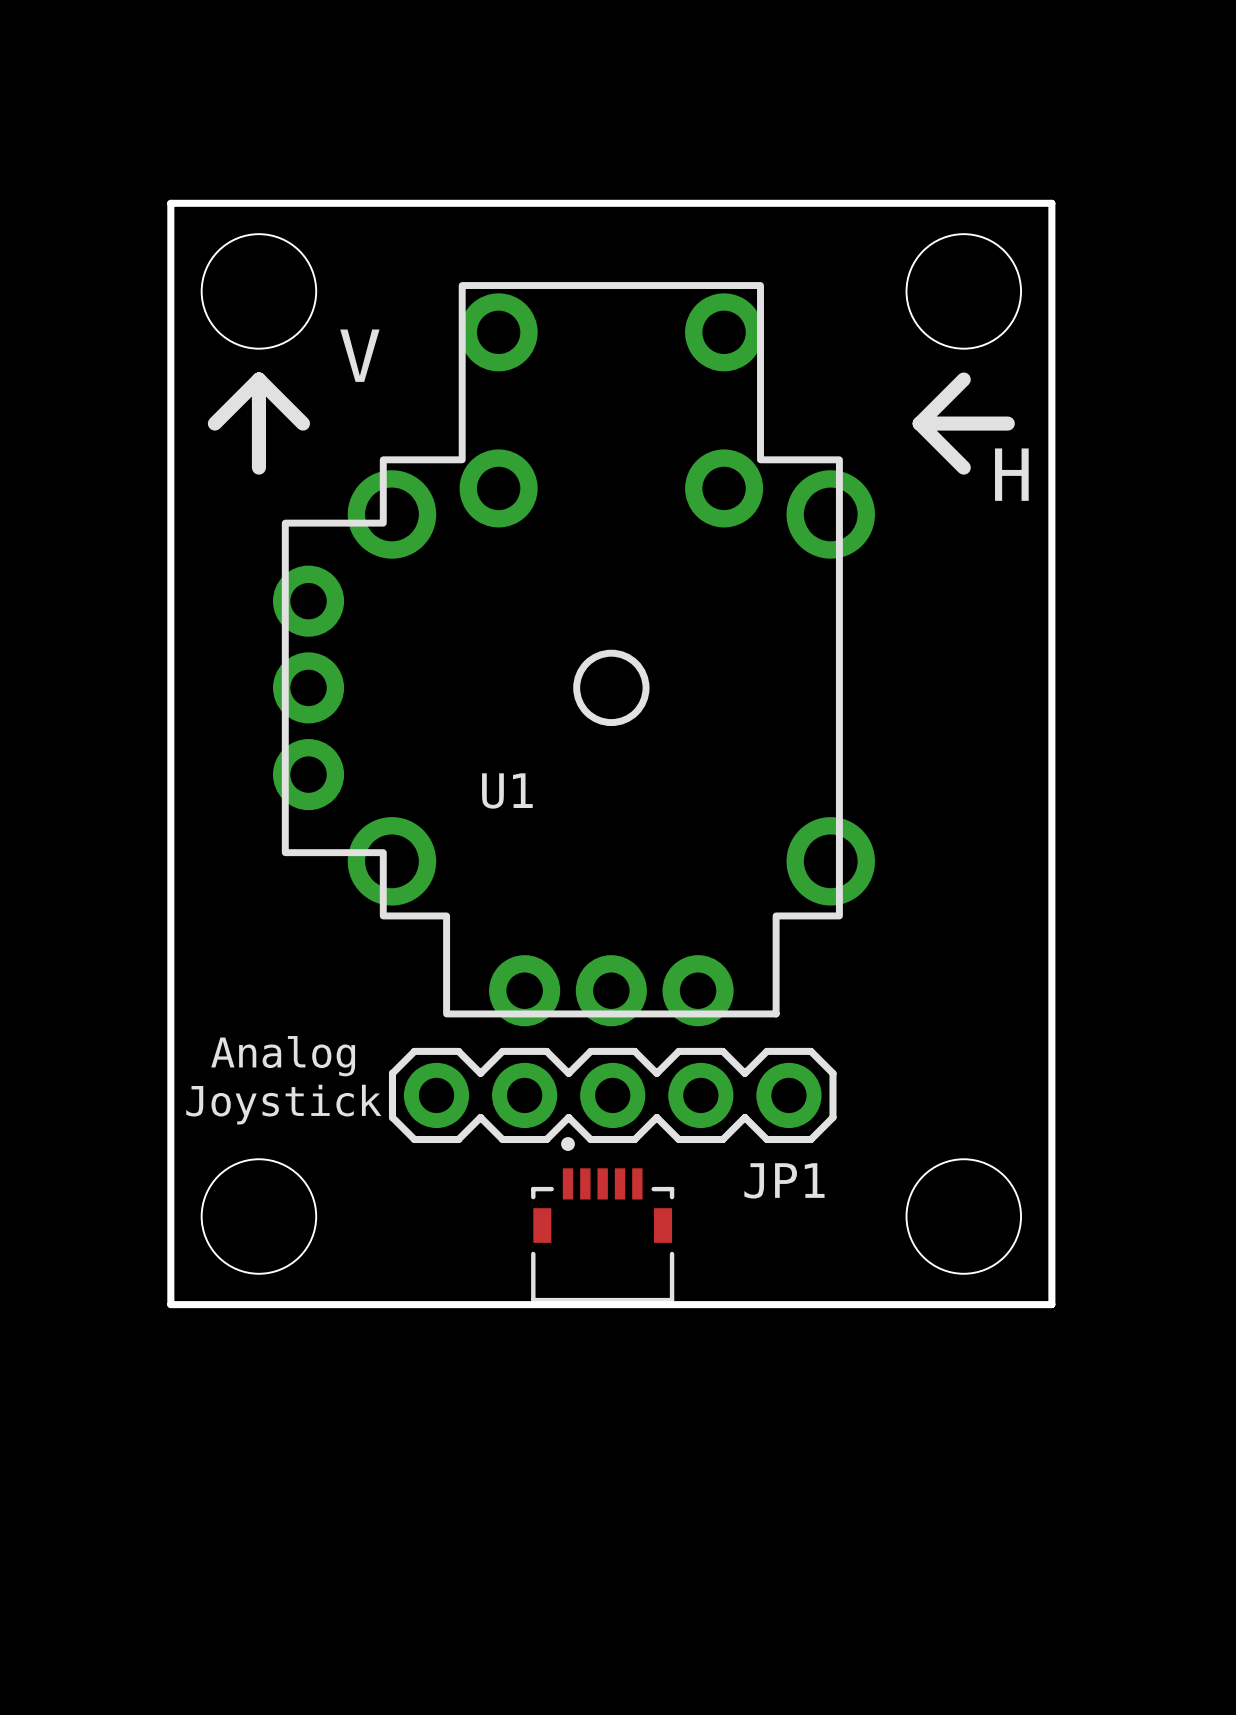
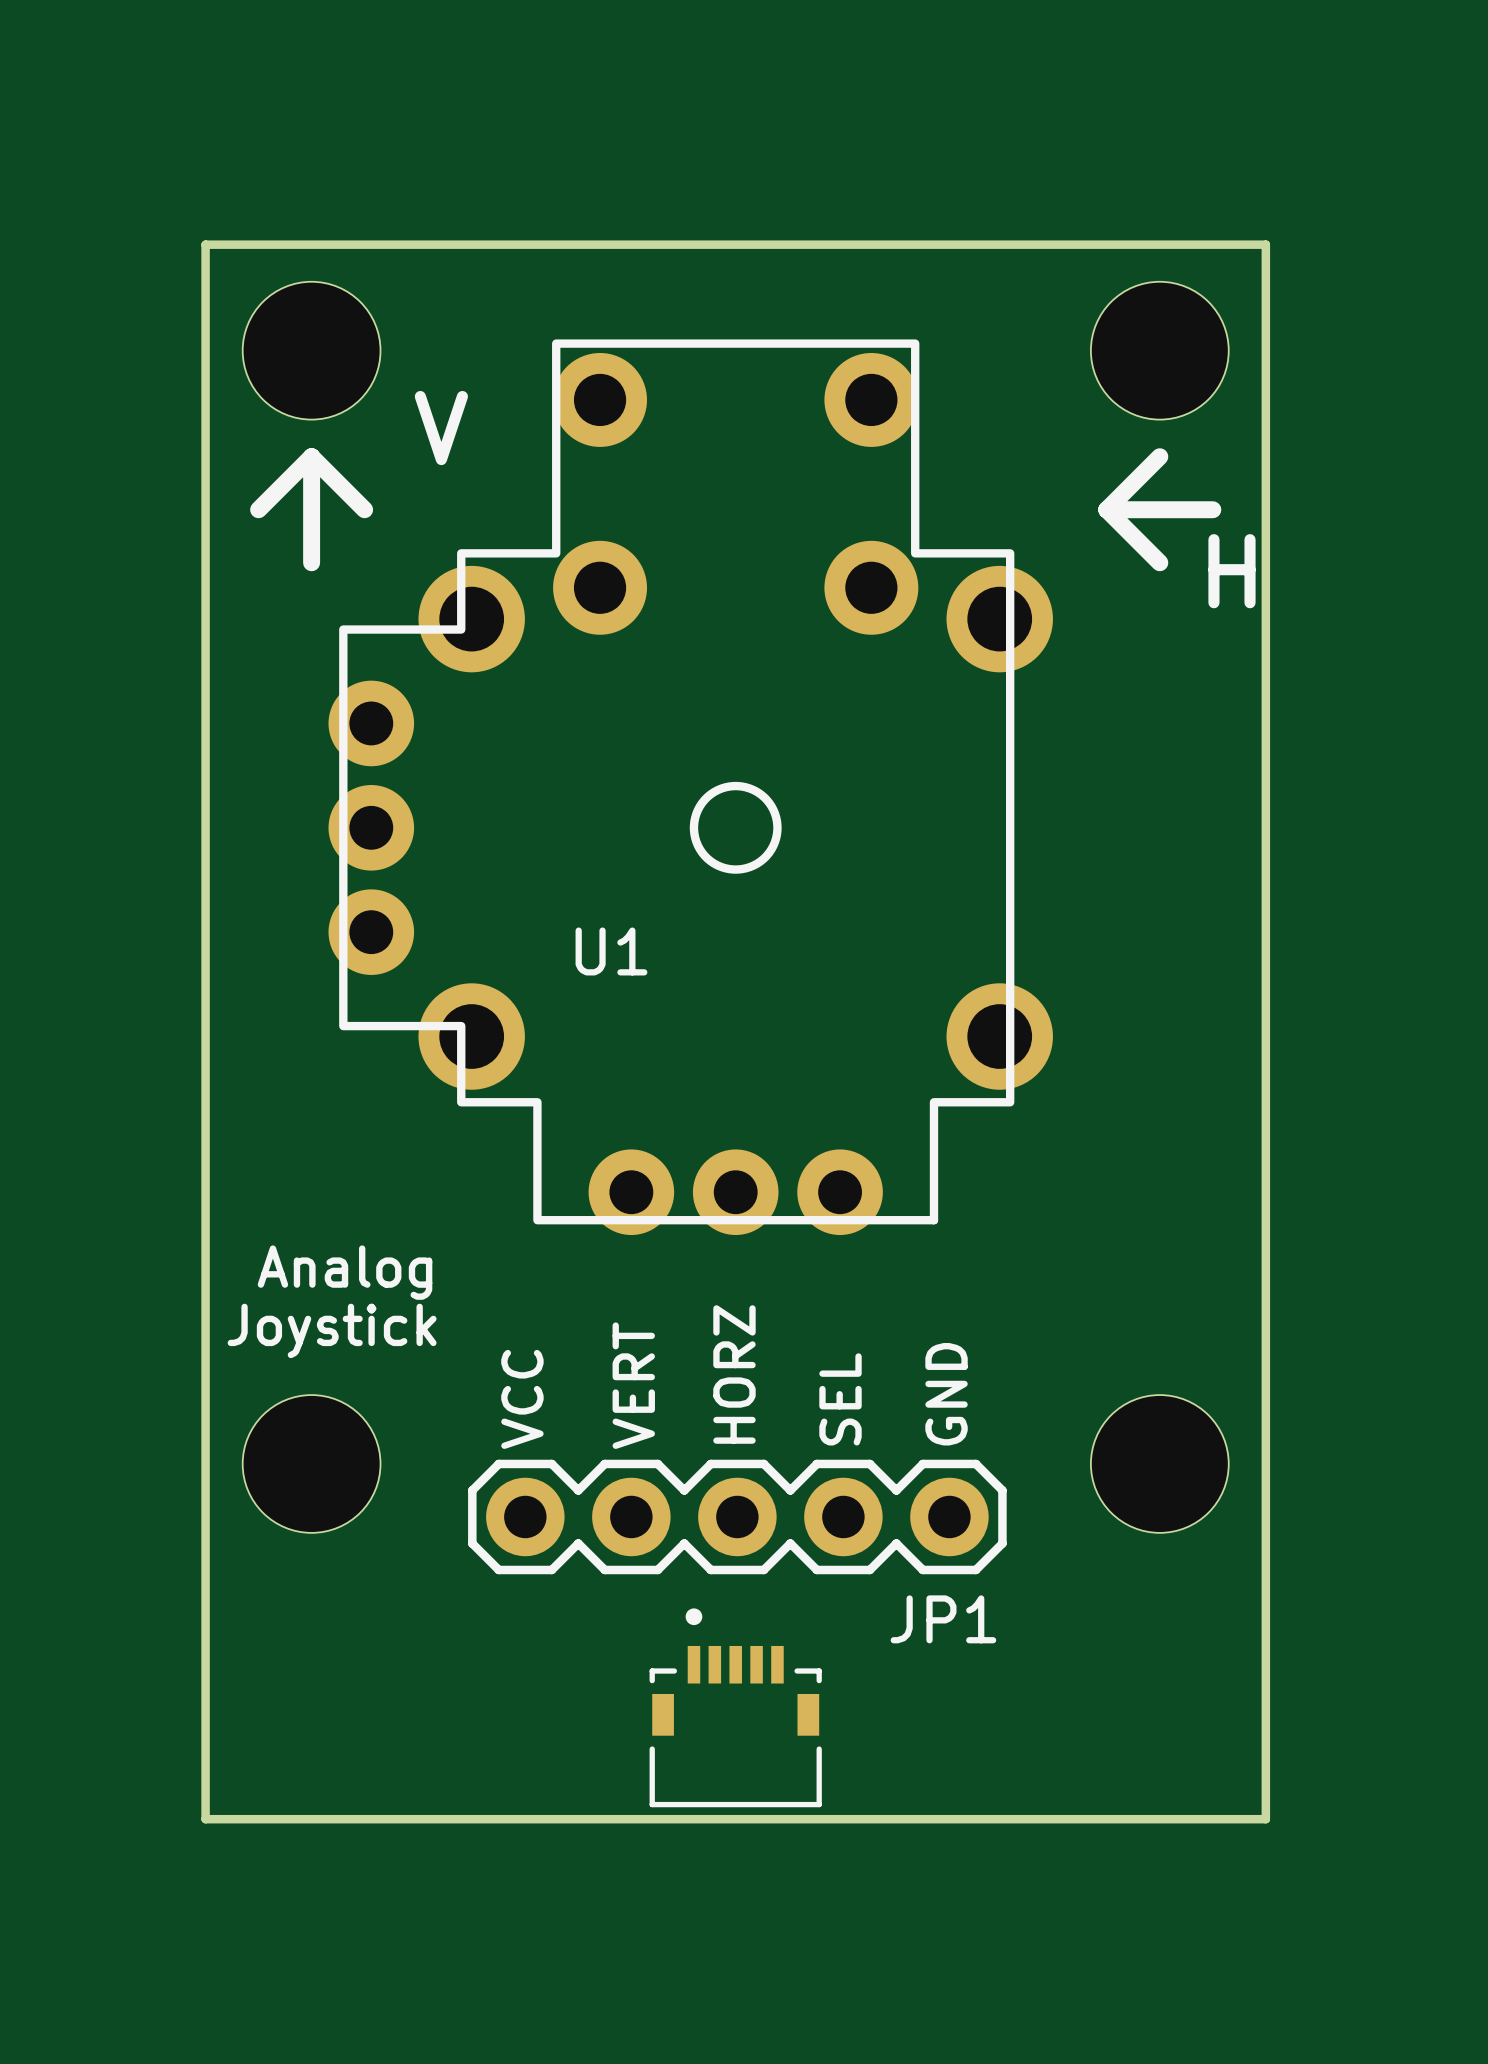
JP1 position: (612, 1095) -> (737, 1516)
text: none -> HORZ (734, 1374)
text: none -> VERT (633, 1385)
text: none -> SEL (840, 1399)
text: none -> GND (946, 1394)
text: none -> VCC (522, 1399)
part position: (602, 1219) -> (735, 1707)
board edge: (170, 1304) (1051, 1304) -> (205, 1569) (205, 1819) (1265, 1819) (1265, 1569)

